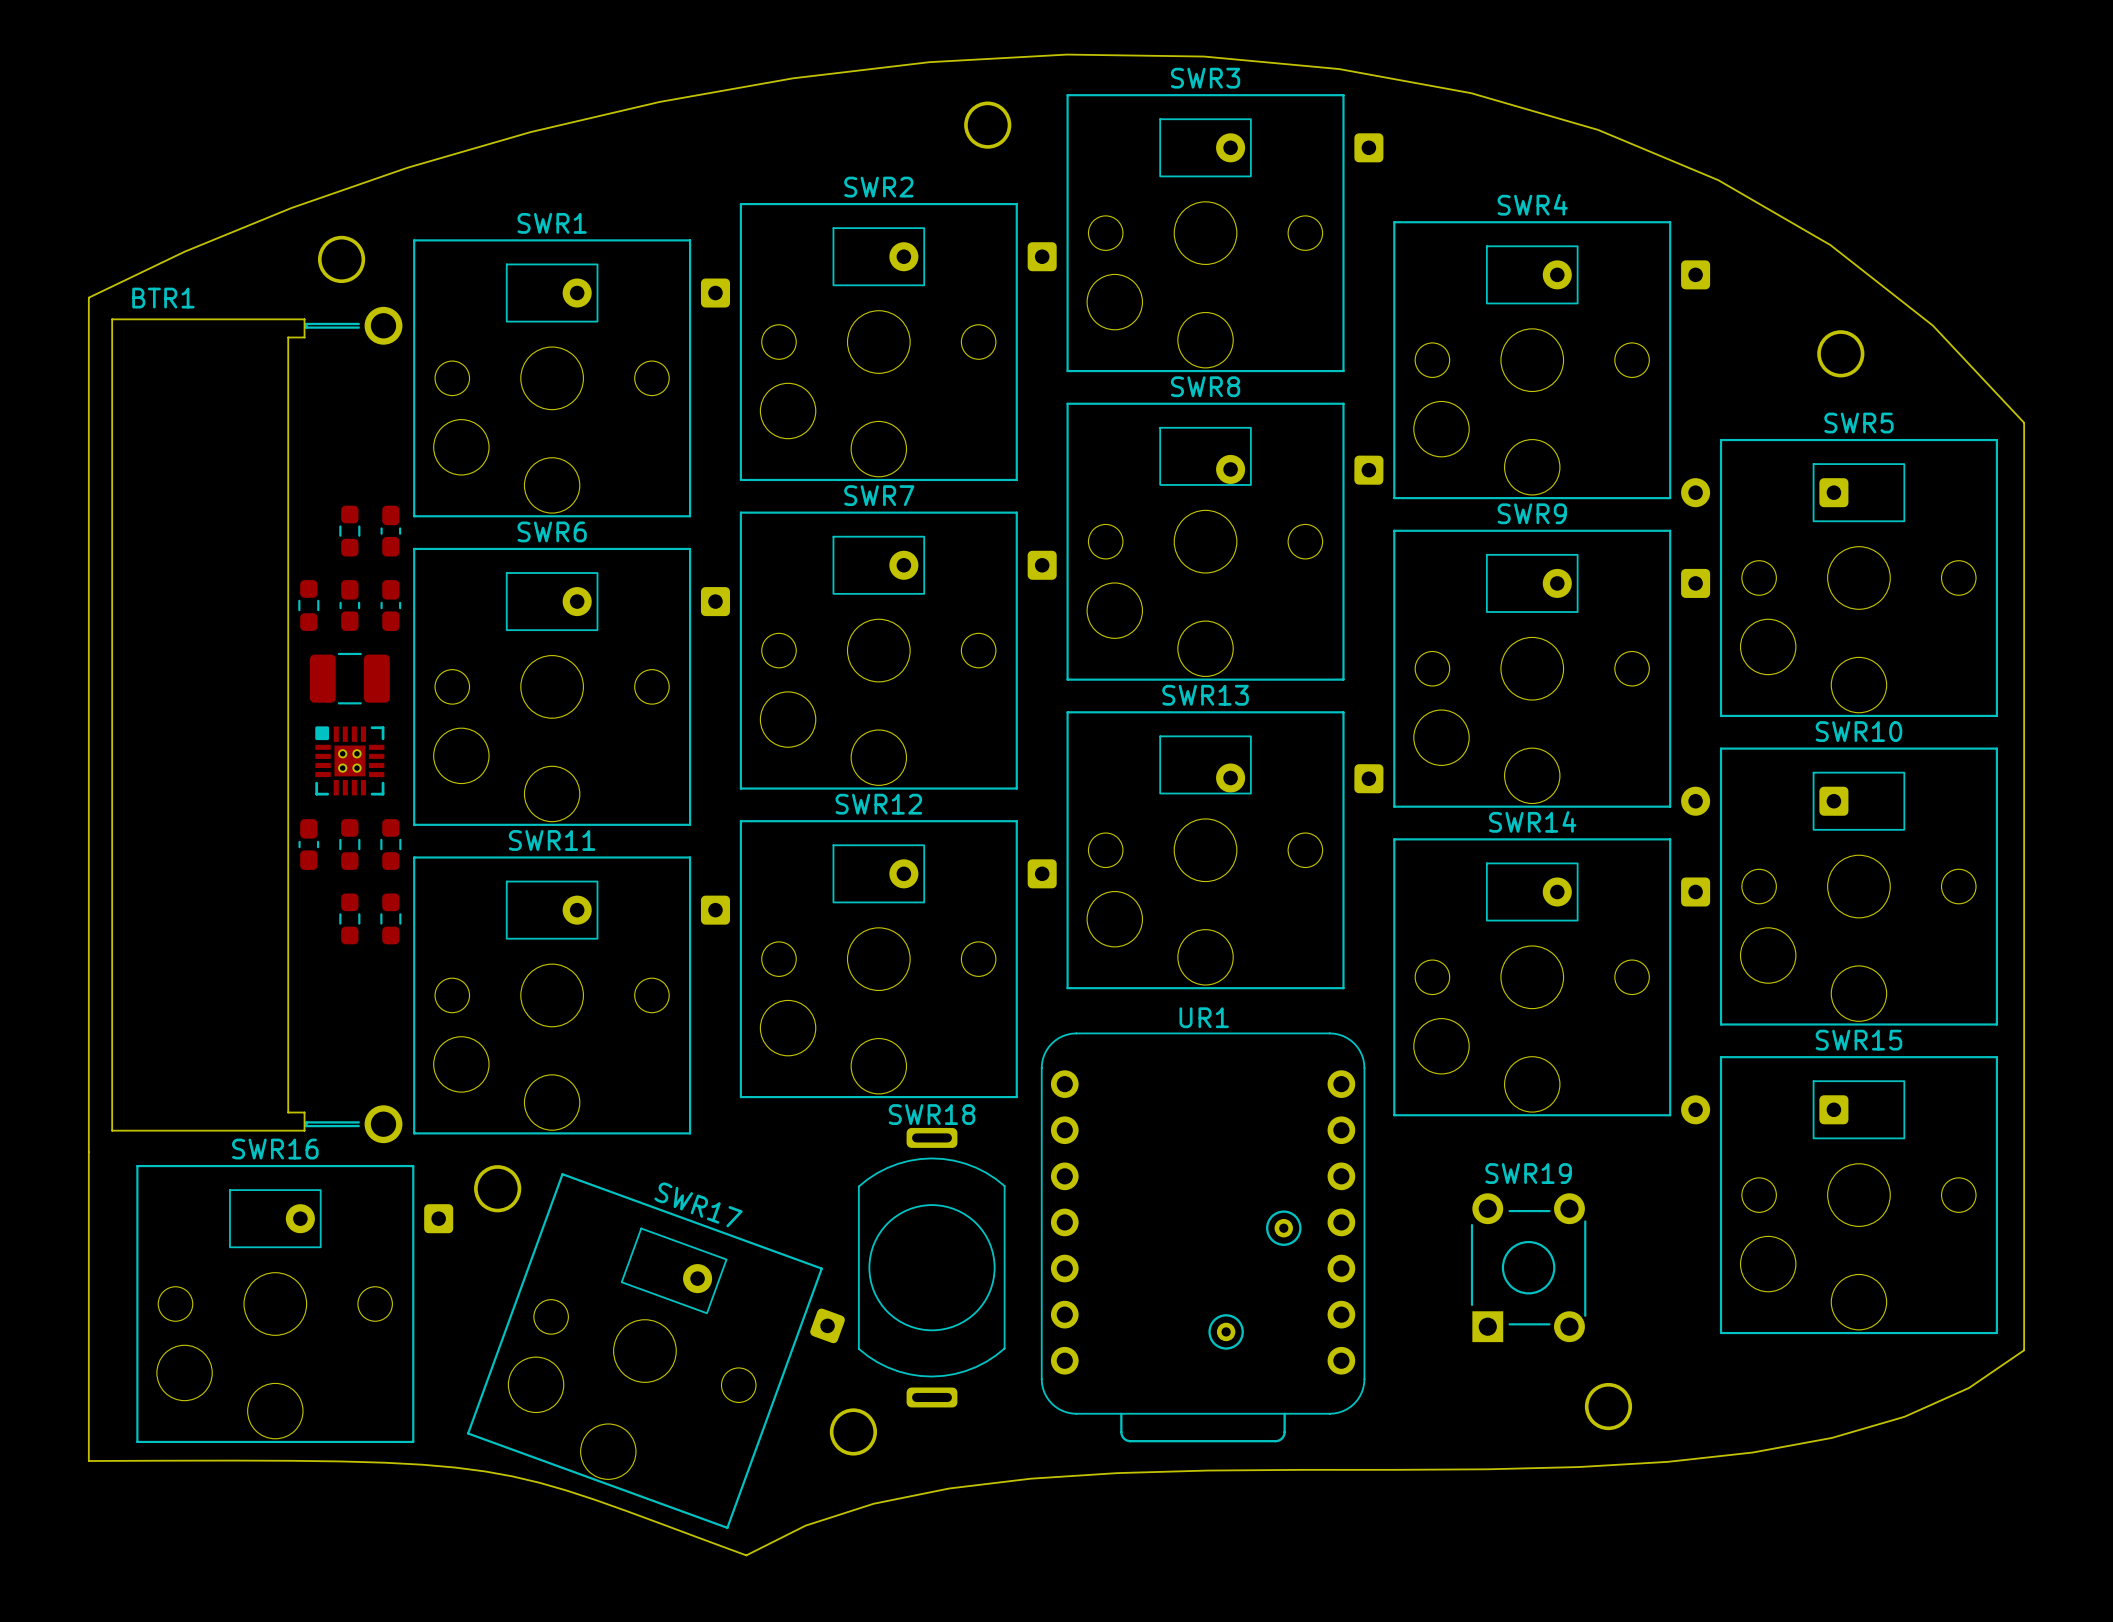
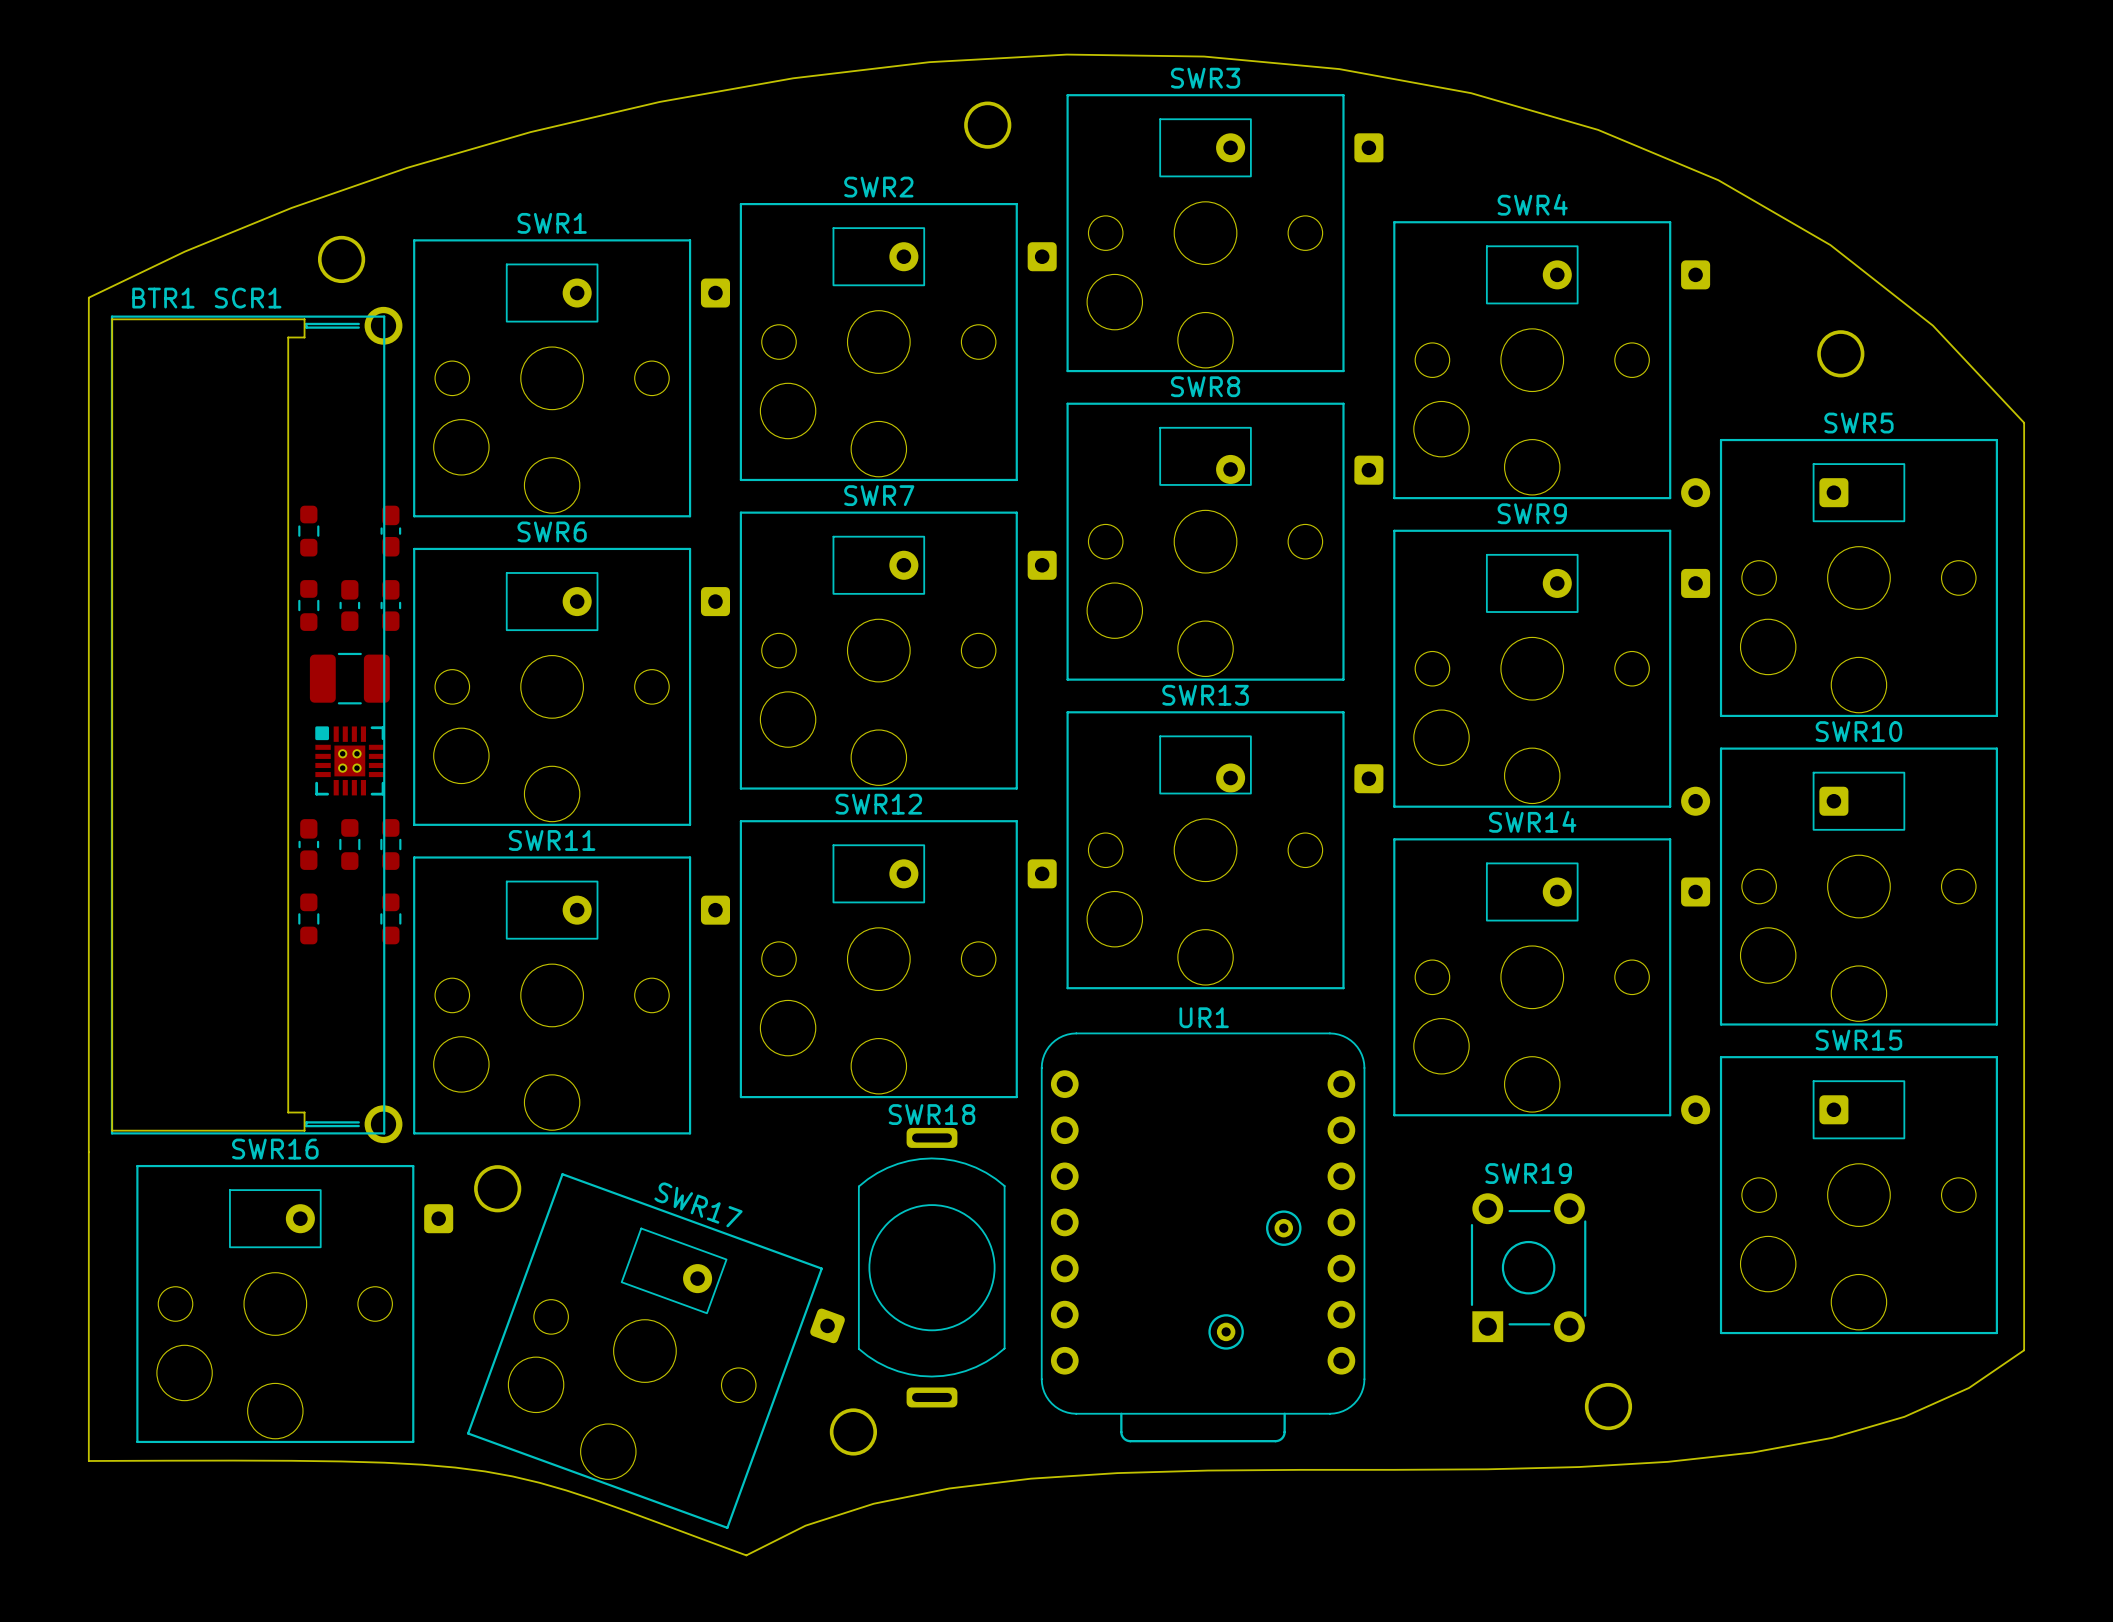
part position: (349, 531) -> (308, 531)
SCR1: none -> (248, 725)
part position: (349, 918) -> (308, 918)

